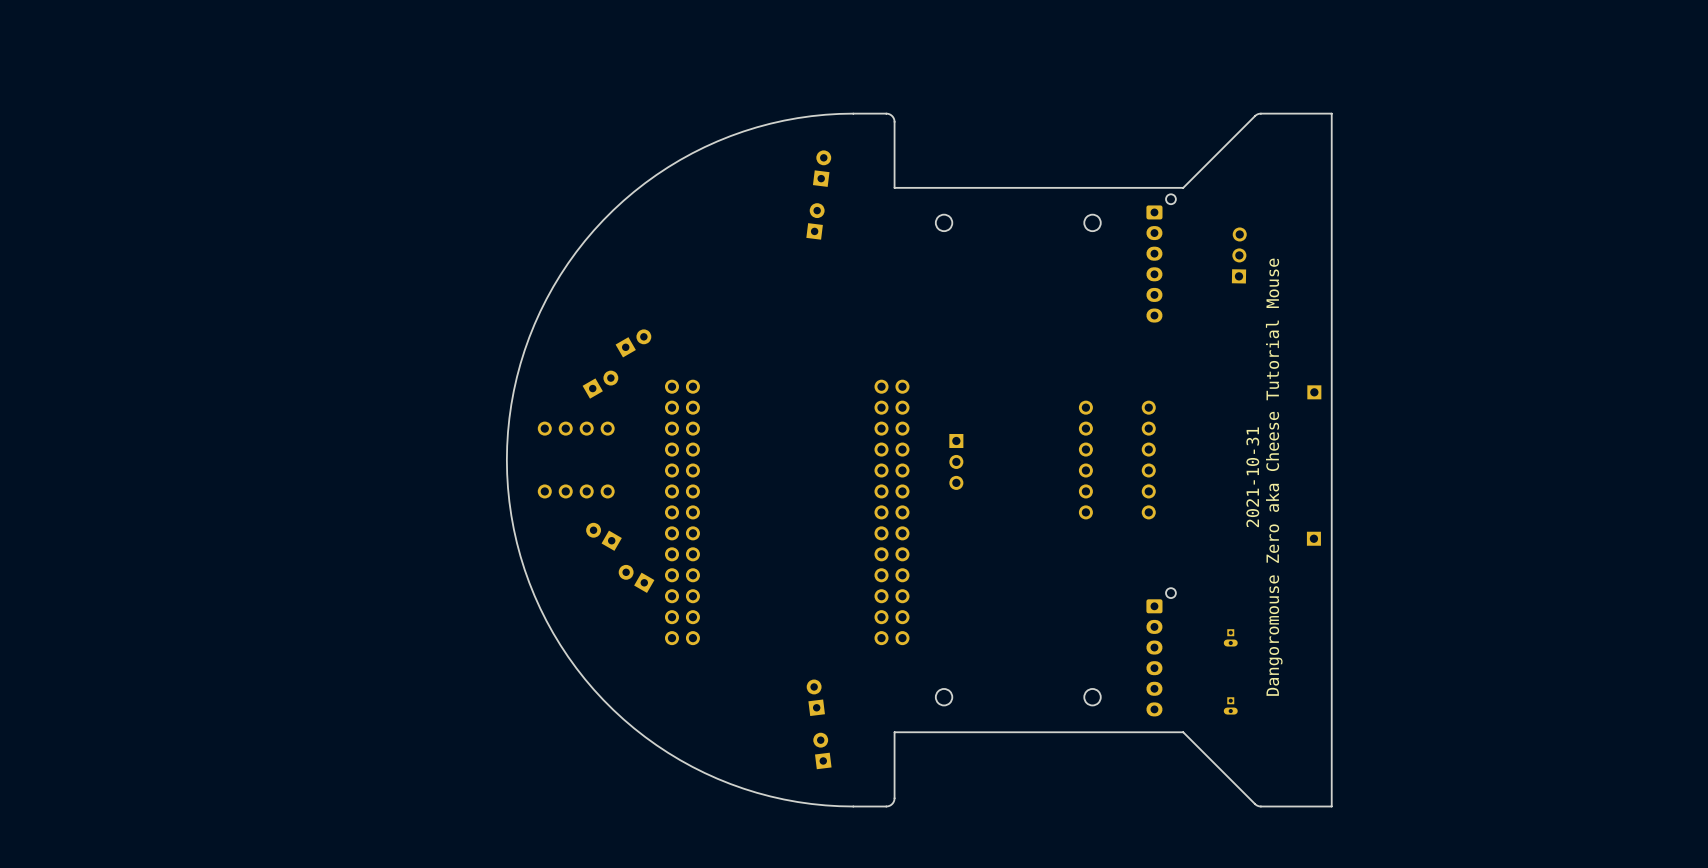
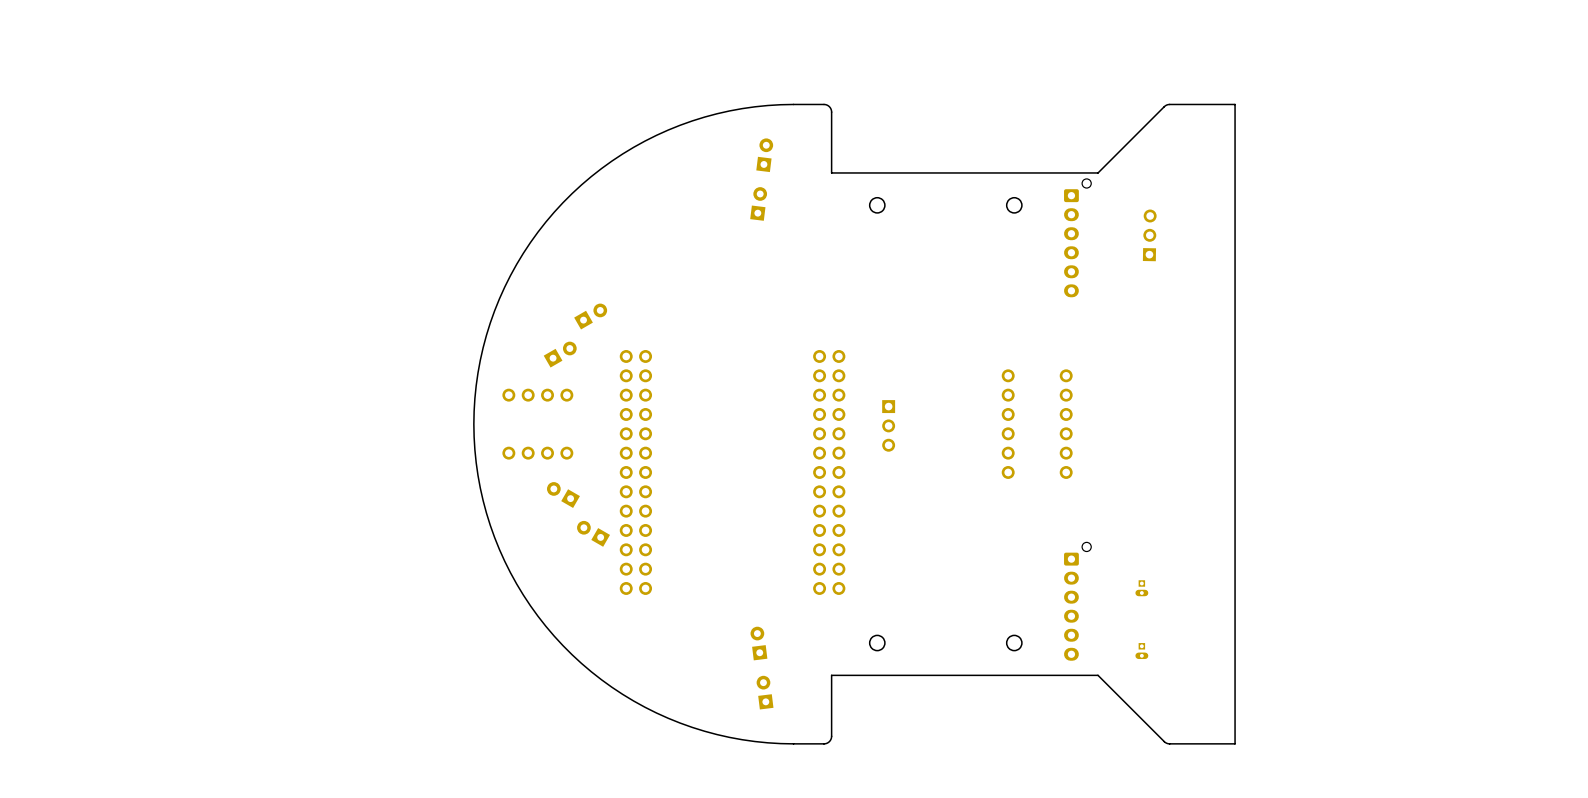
part: (1314, 392) -> none
text: 2021-10-31 (1252, 477) -> none
text: Dangoromouse Zero aka Cheese Tutorial Mouse (1274, 477) -> none
part: (1313, 538) -> none

